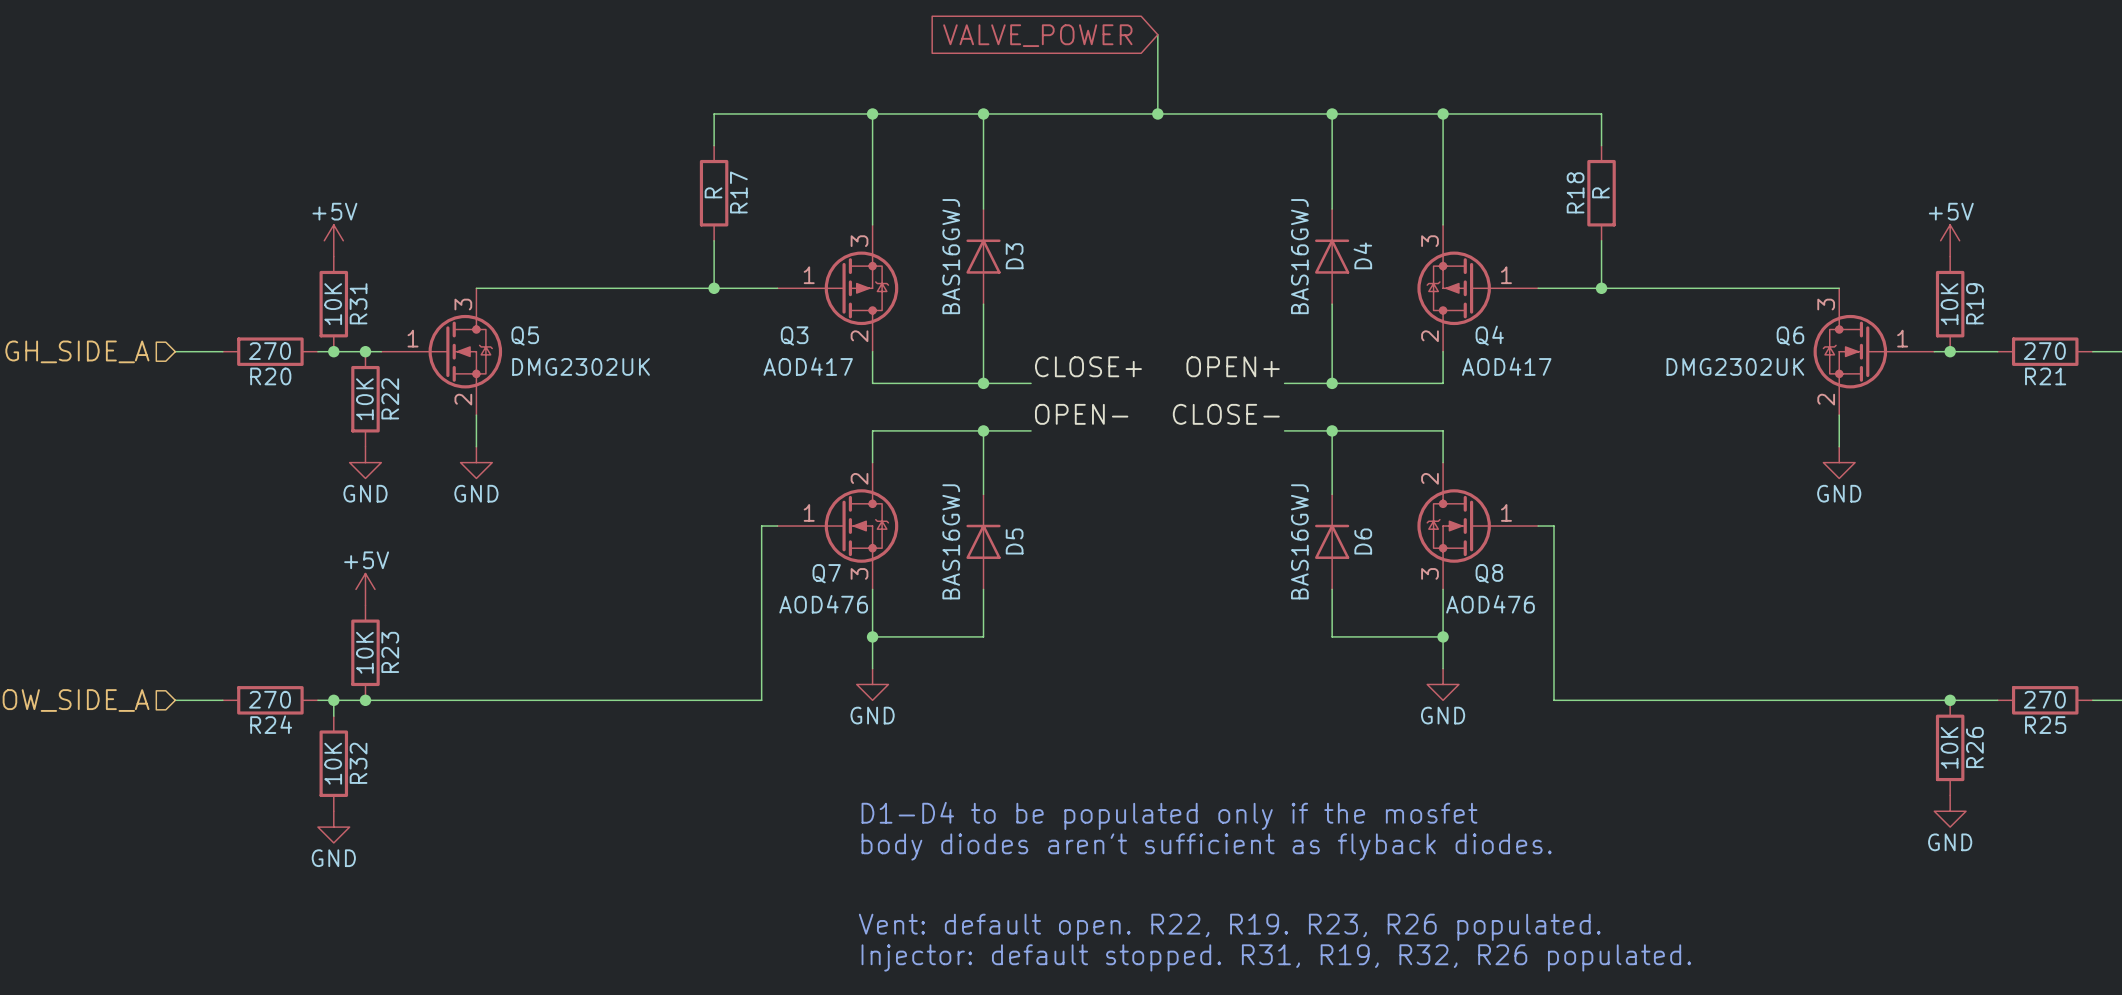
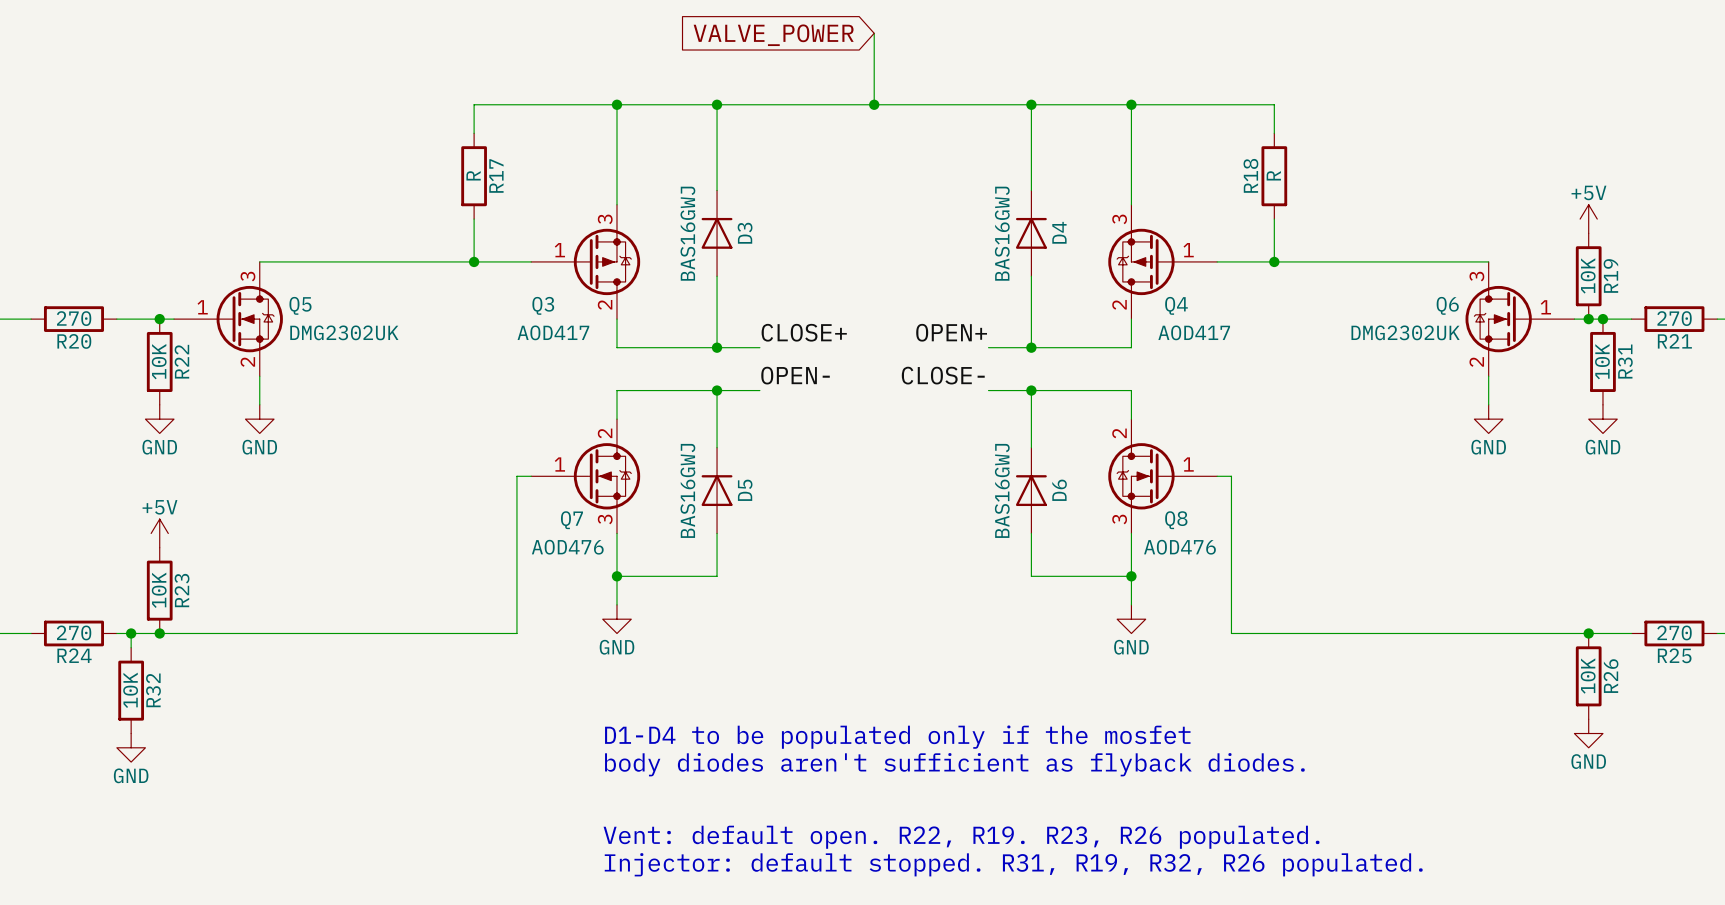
power symbol: +5V (333, 240) -> none
R31 position: (333, 304) -> (1602, 361)
junction: (333, 351) -> none
junction: none -> (1602, 319)
power symbol: none -> GND (1602, 419)

